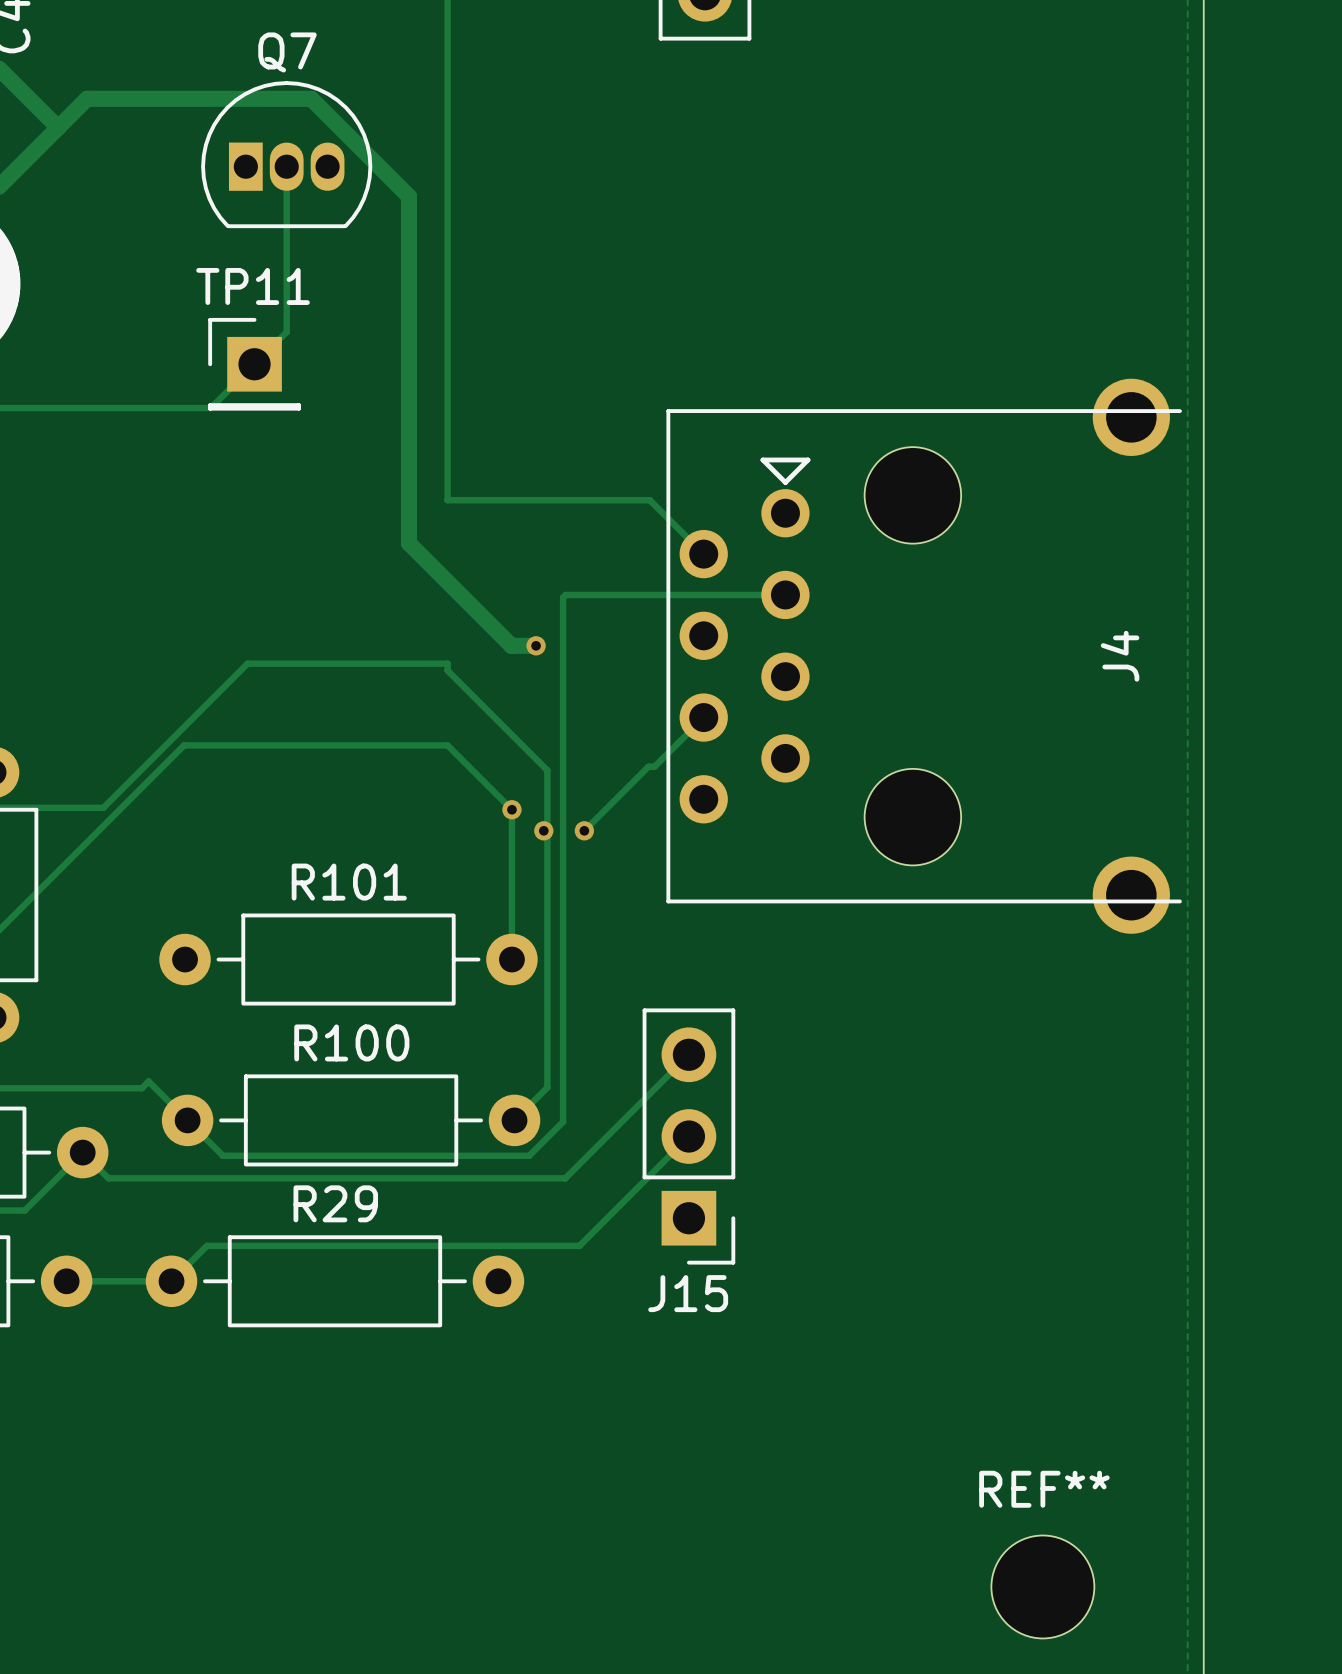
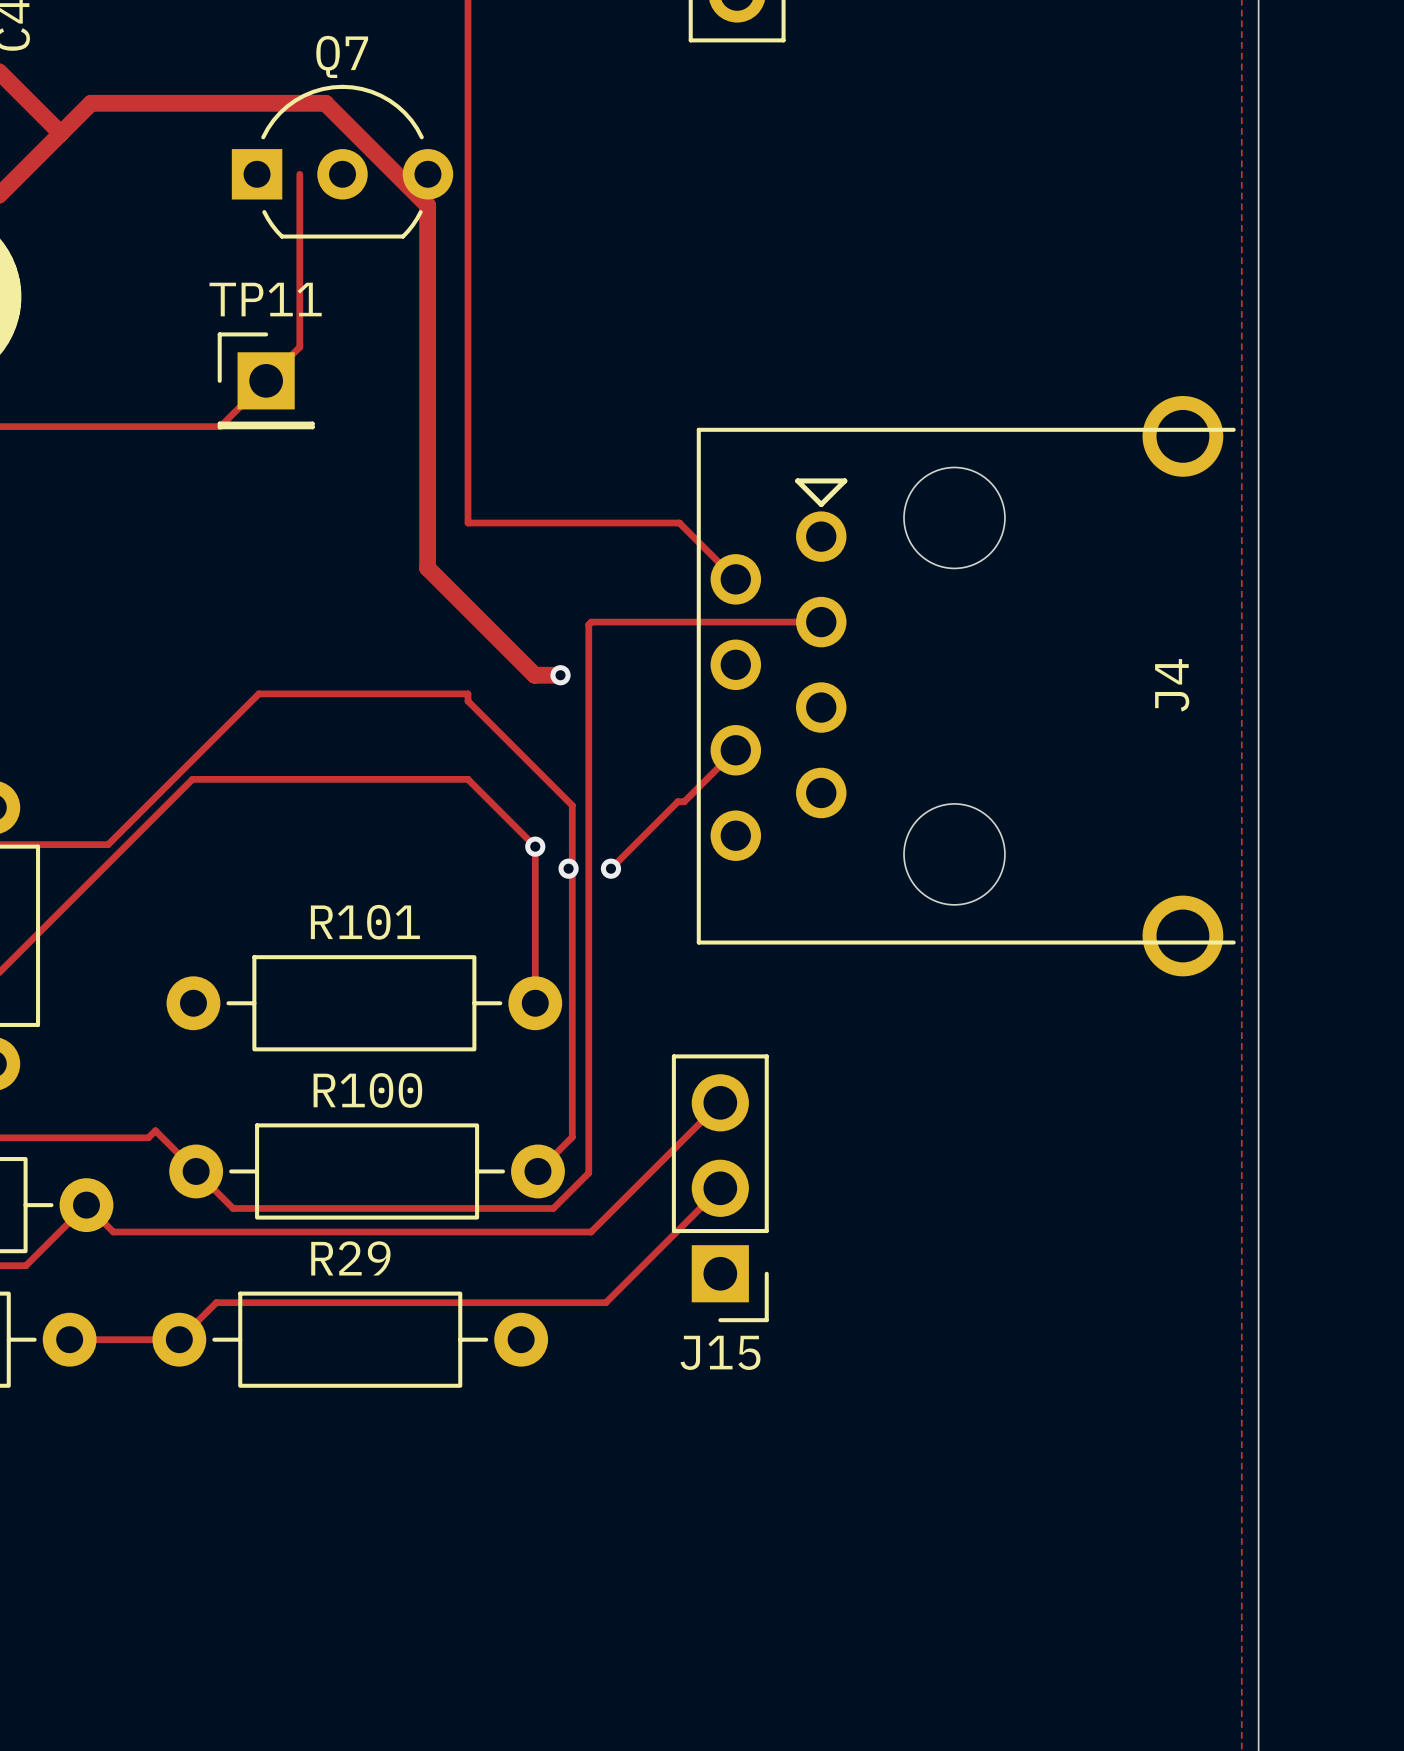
Q7 footprint: [201, 81, 373, 229] -> [231, 84, 454, 239]
REF**: (1042, 1586) -> none

